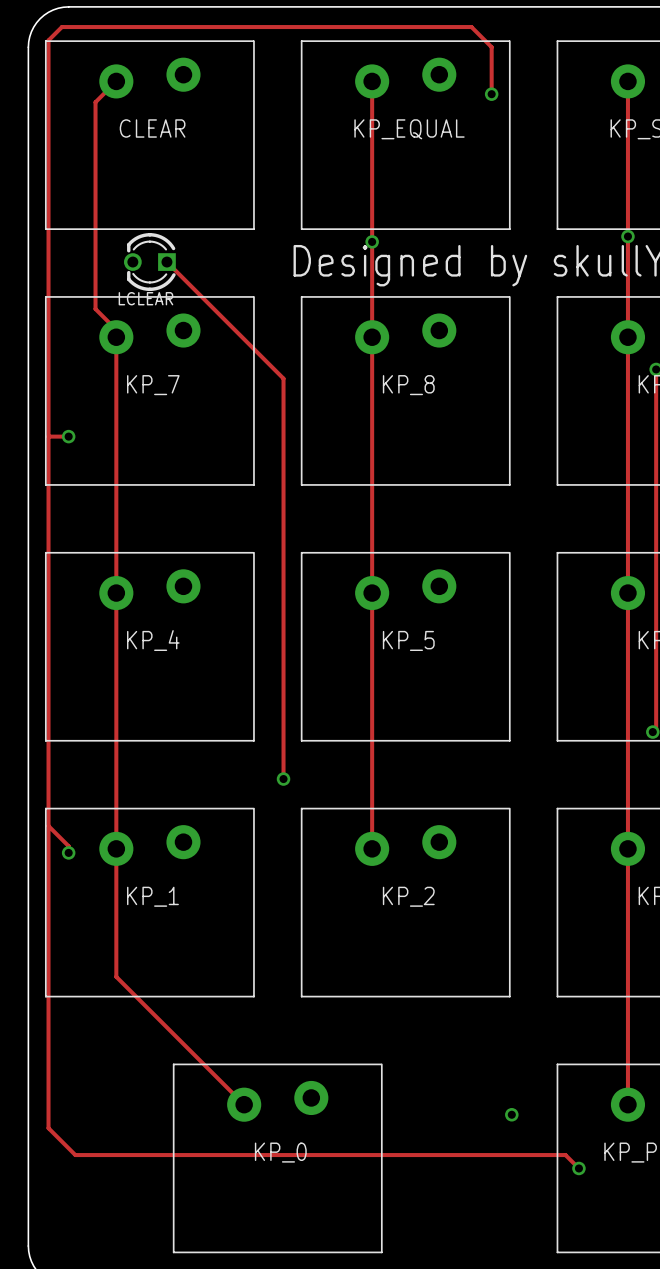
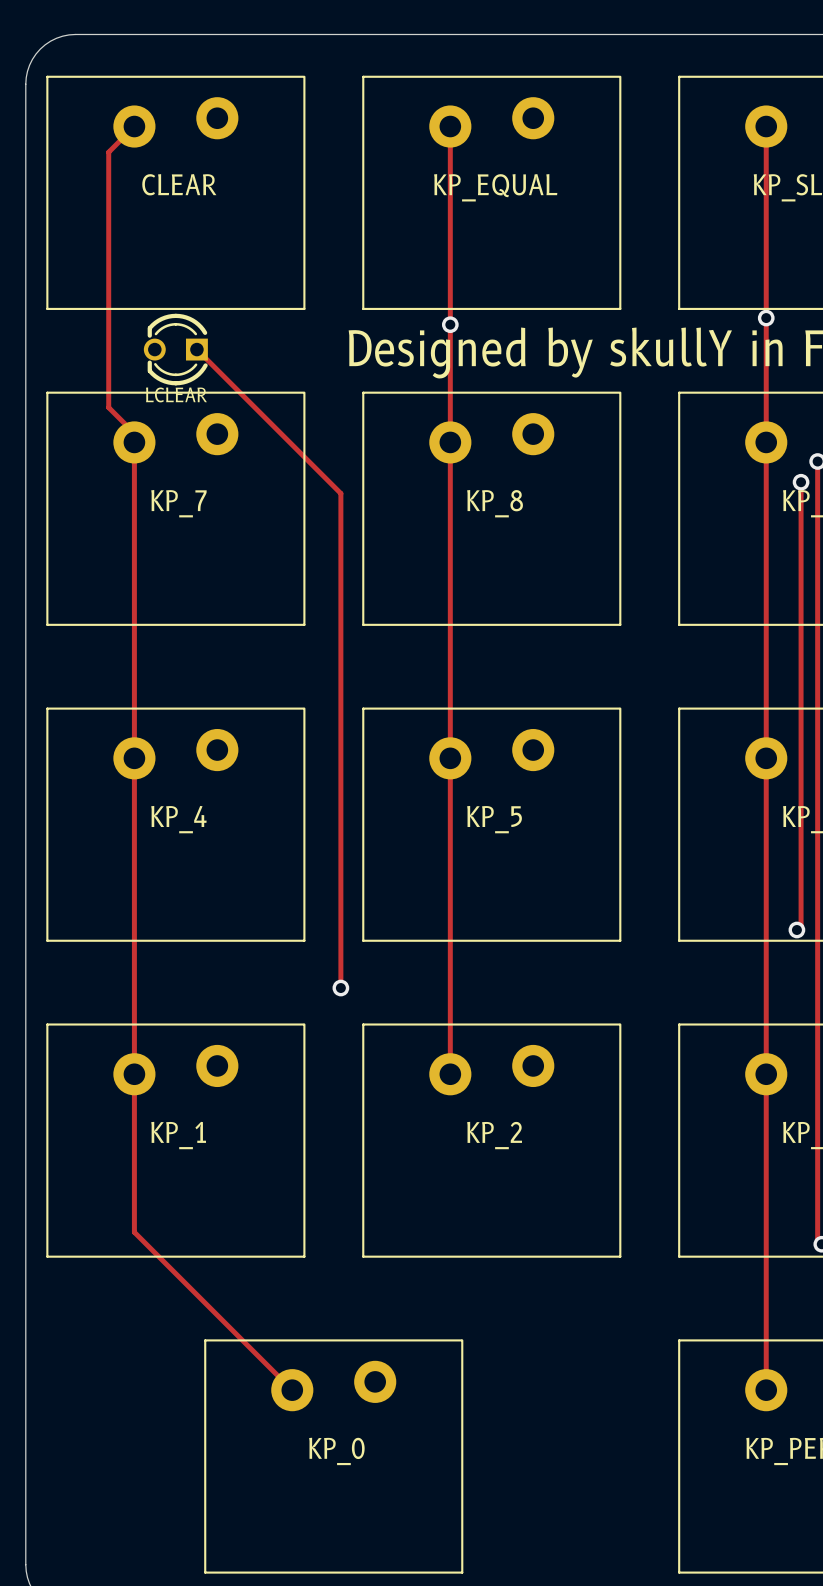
track: (491, 94) (491, 47) (471, 27) (61, 27) (48, 40) (48, 1128) (75, 1155) (565, 1155) (578, 1168) -> none
via: (491, 94) -> none
track: (48, 436) (68, 436) -> none
via: (68, 436) -> none
track: (48, 826) (68, 846) (68, 852) -> none
via: (68, 852) -> none
via: (511, 1114) -> none
via: (578, 1168) -> none

